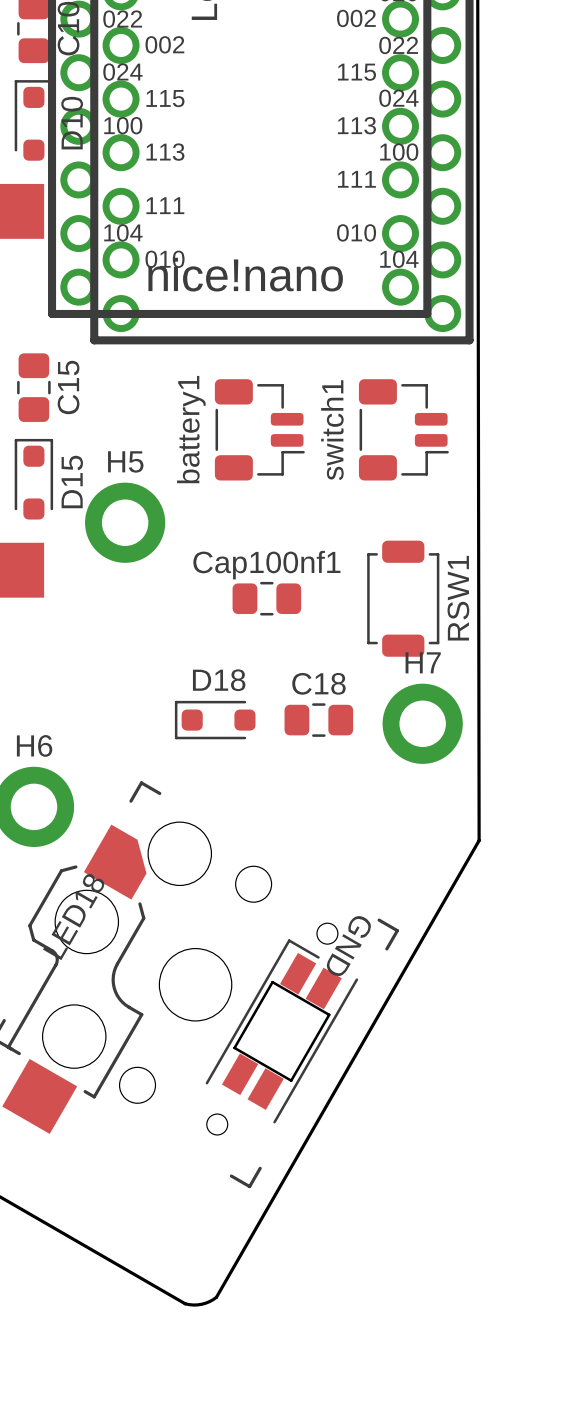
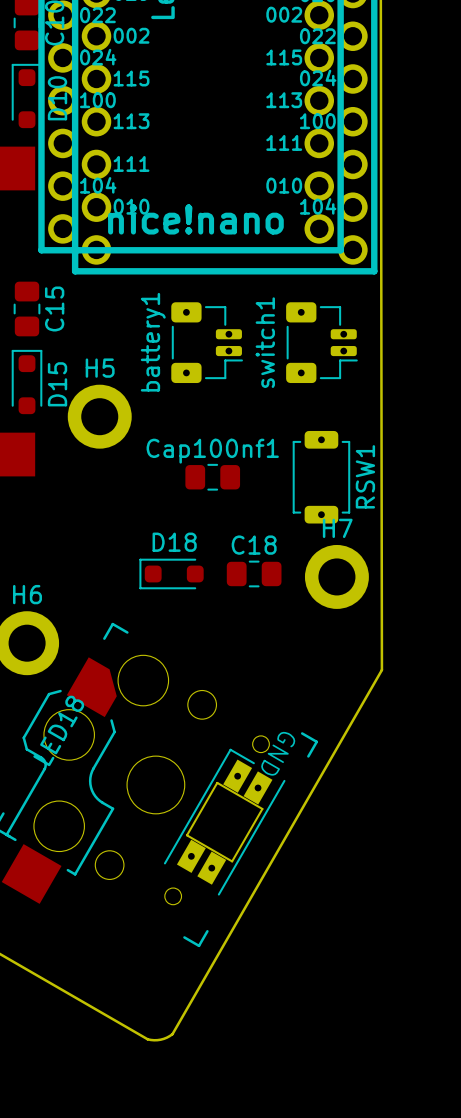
battery1 footprint: [214, 379, 305, 481] -> [171, 302, 243, 384]
switch1 footprint: [358, 379, 449, 481] -> [286, 302, 358, 384]
RSW1 footprint: [367, 540, 440, 657] -> [292, 430, 351, 524]
LED18 footprint: [205, 939, 359, 1124] -> [163, 748, 286, 896]

